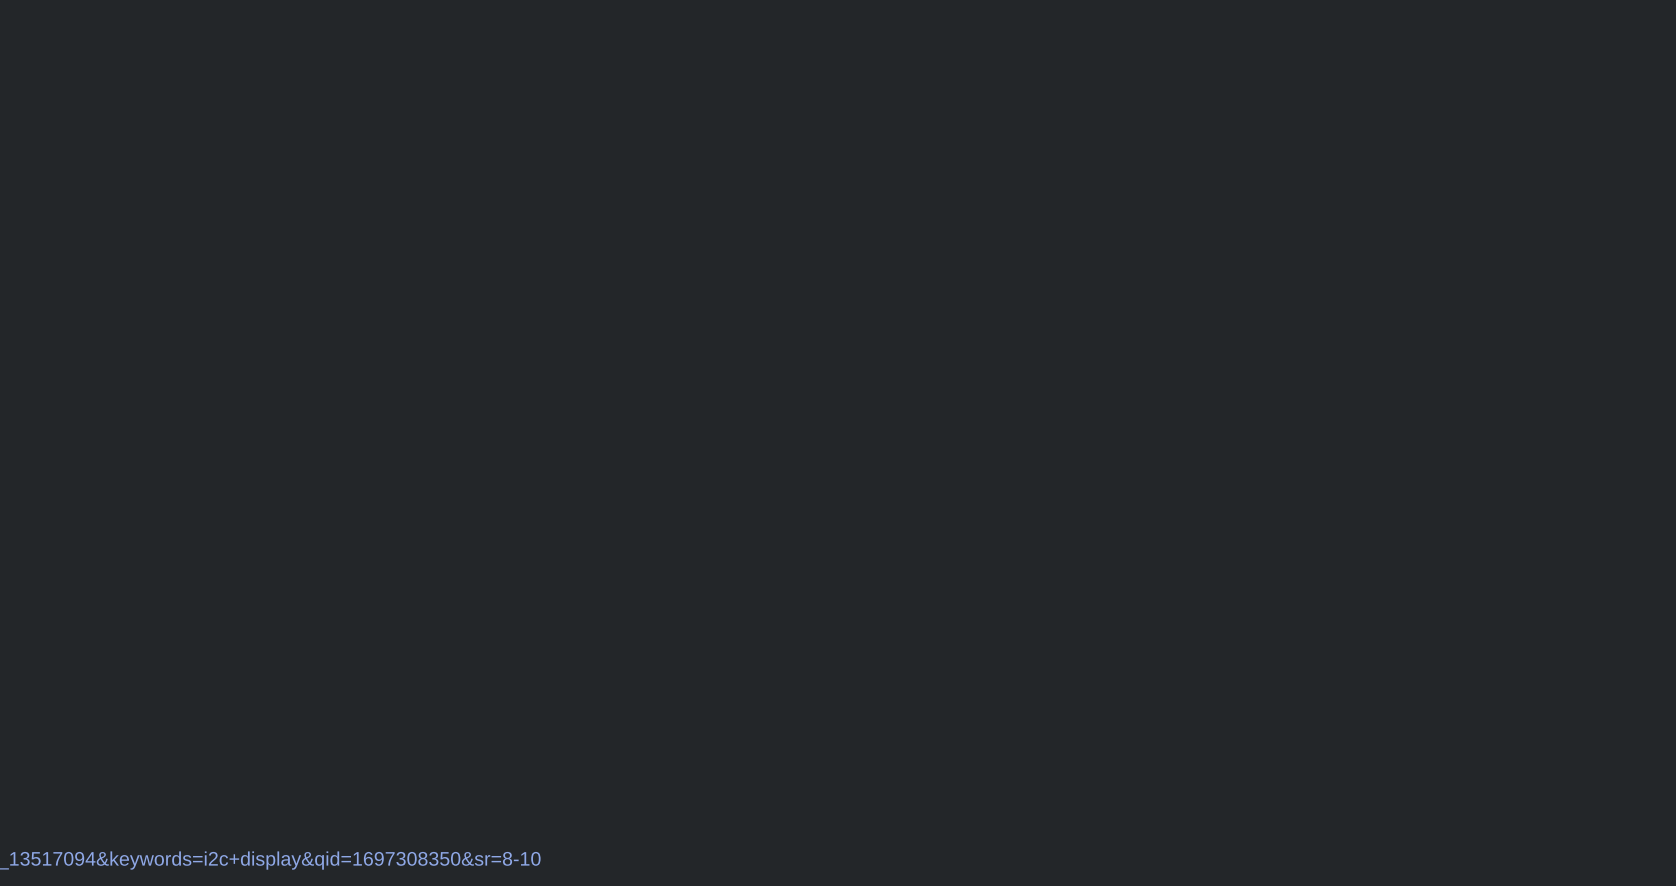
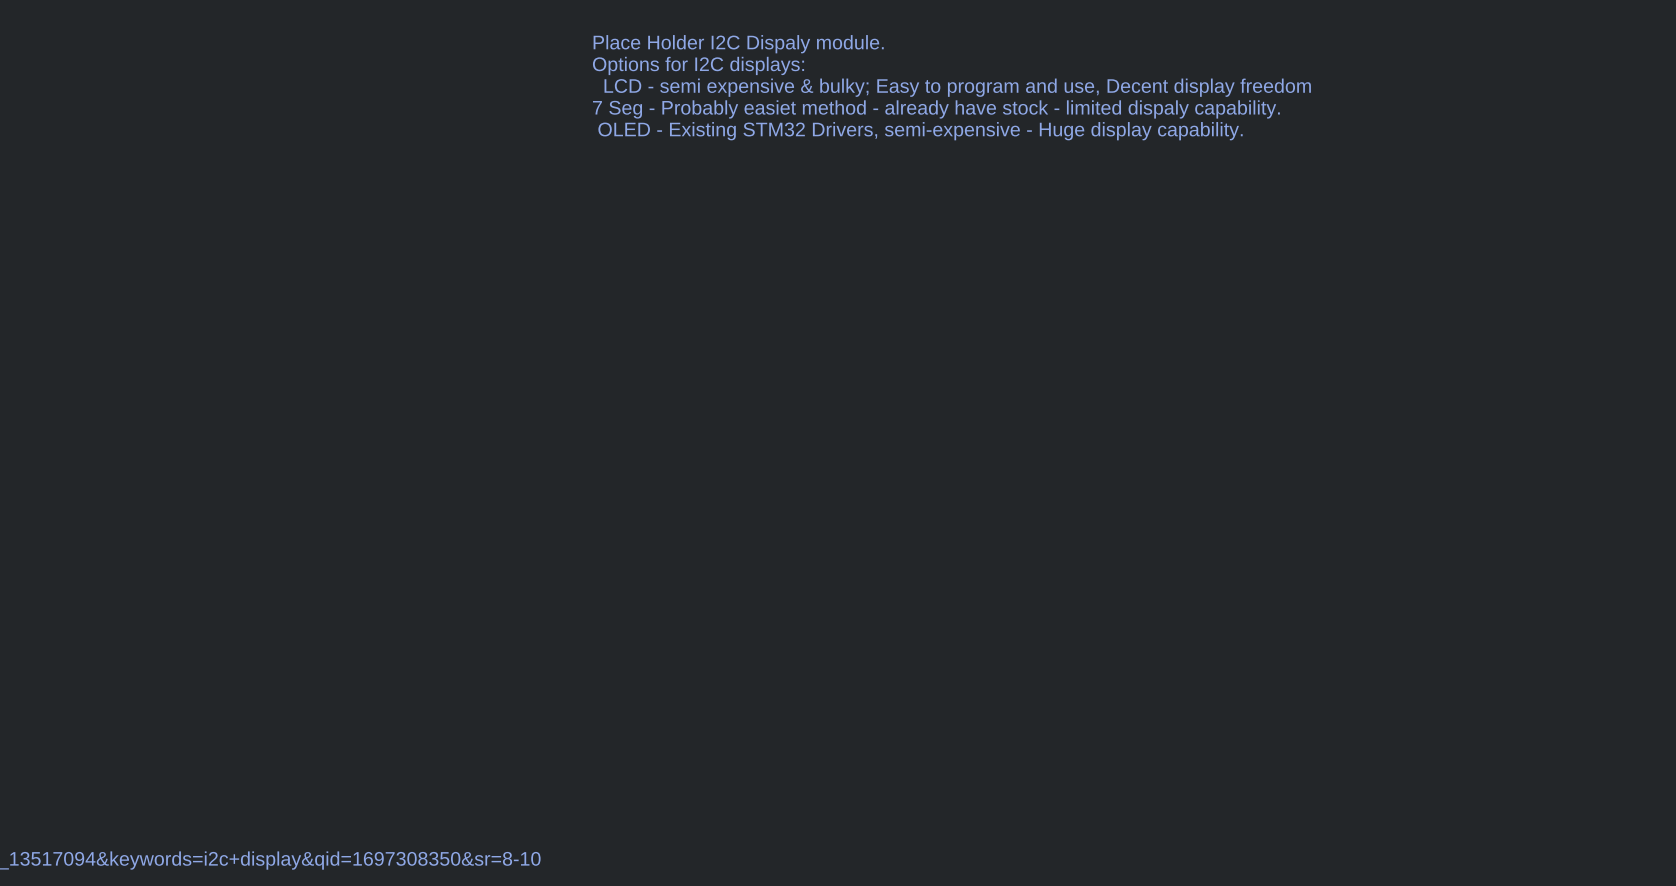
text: none -> Place Holder I2C Dispaly module. (738, 44)
text: none -> Options for I2C displays: (698, 65)
text: none -> LCD - semi expensive & bulky; Easy to program and use, Decent display freedom (957, 87)
text: none -> 7 Seg - Probably easiet method - already have stock - limited dispaly capability. (936, 109)
text: none -> OLED - Existing STM32 Drivers, semi-expensive - Huge display capability. (920, 131)

